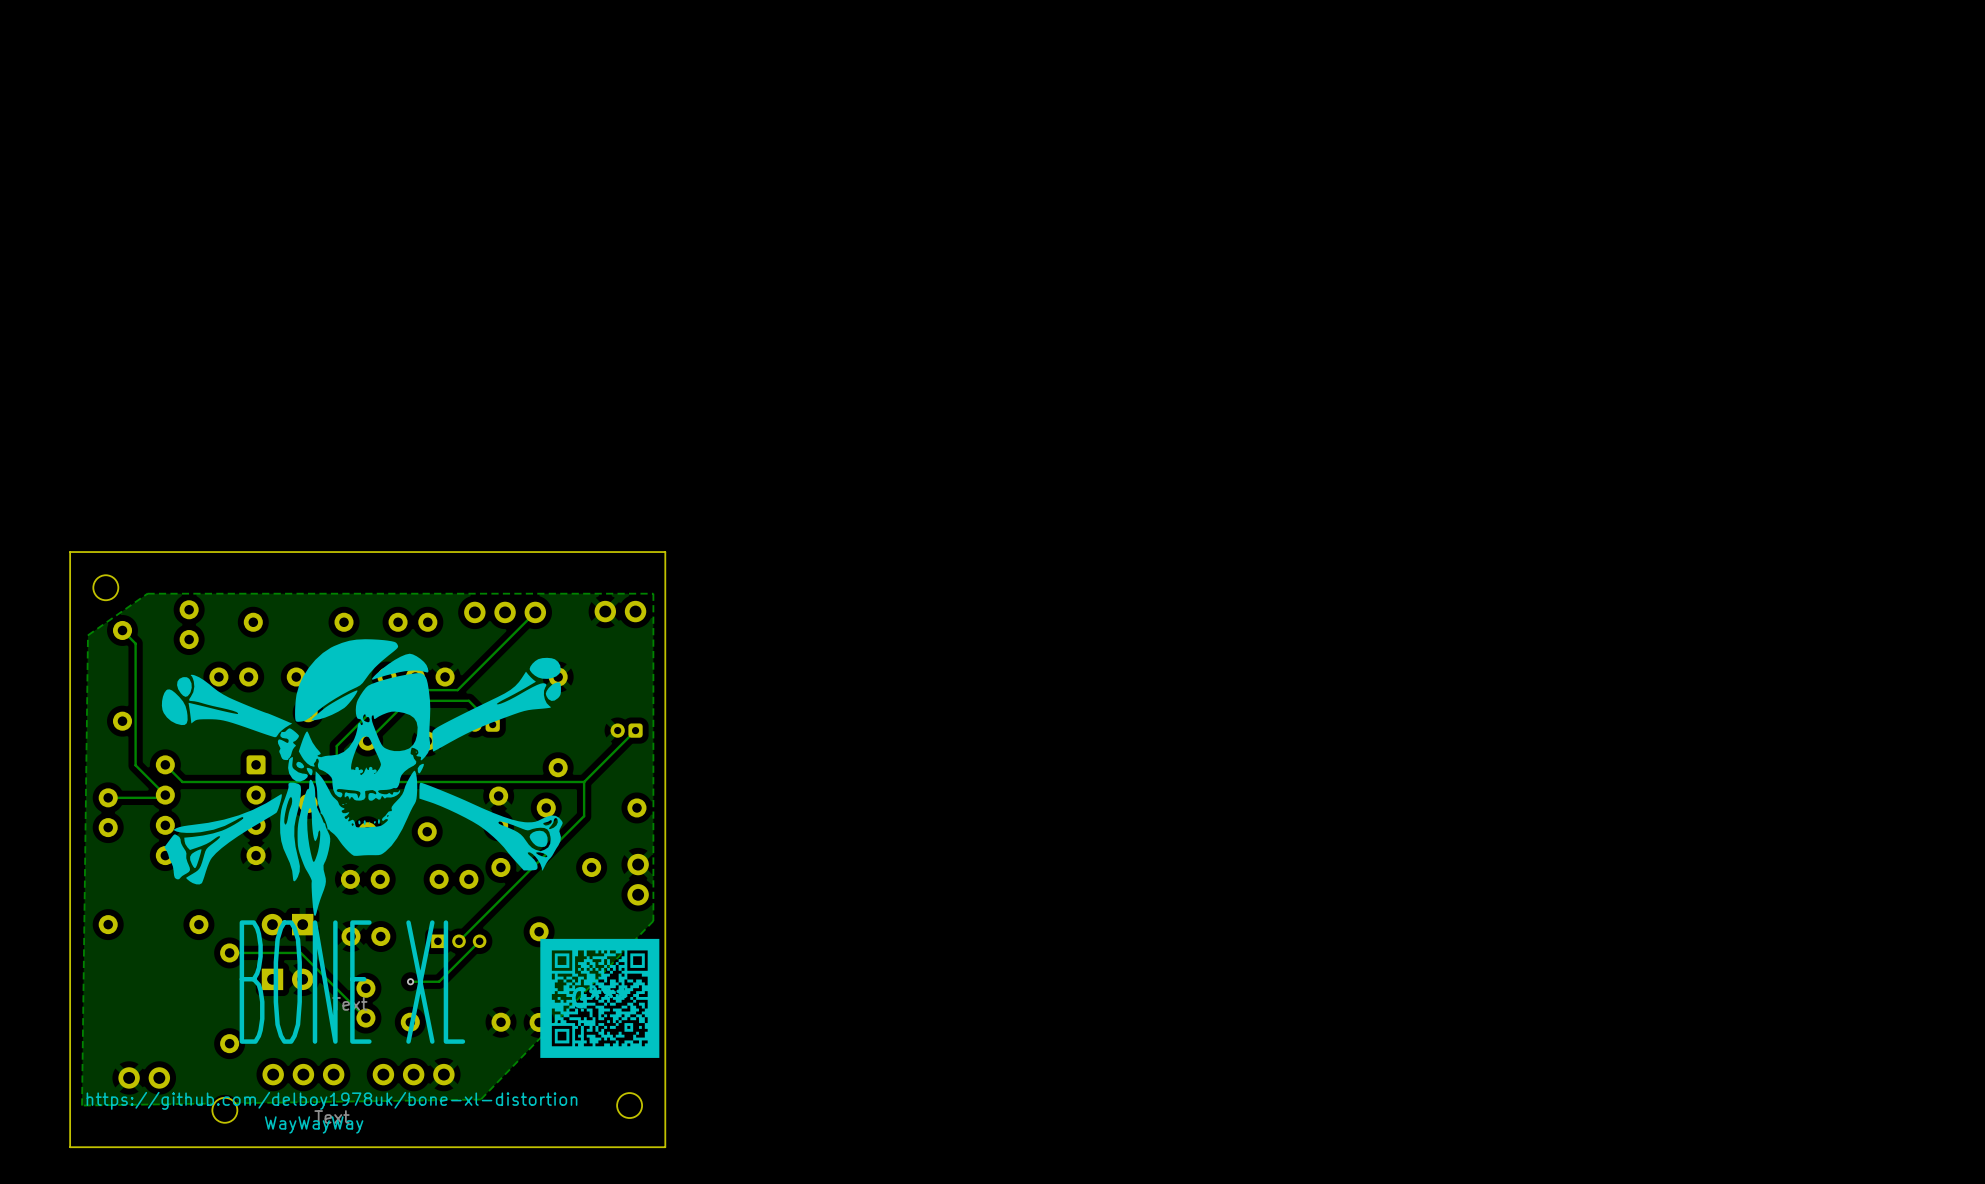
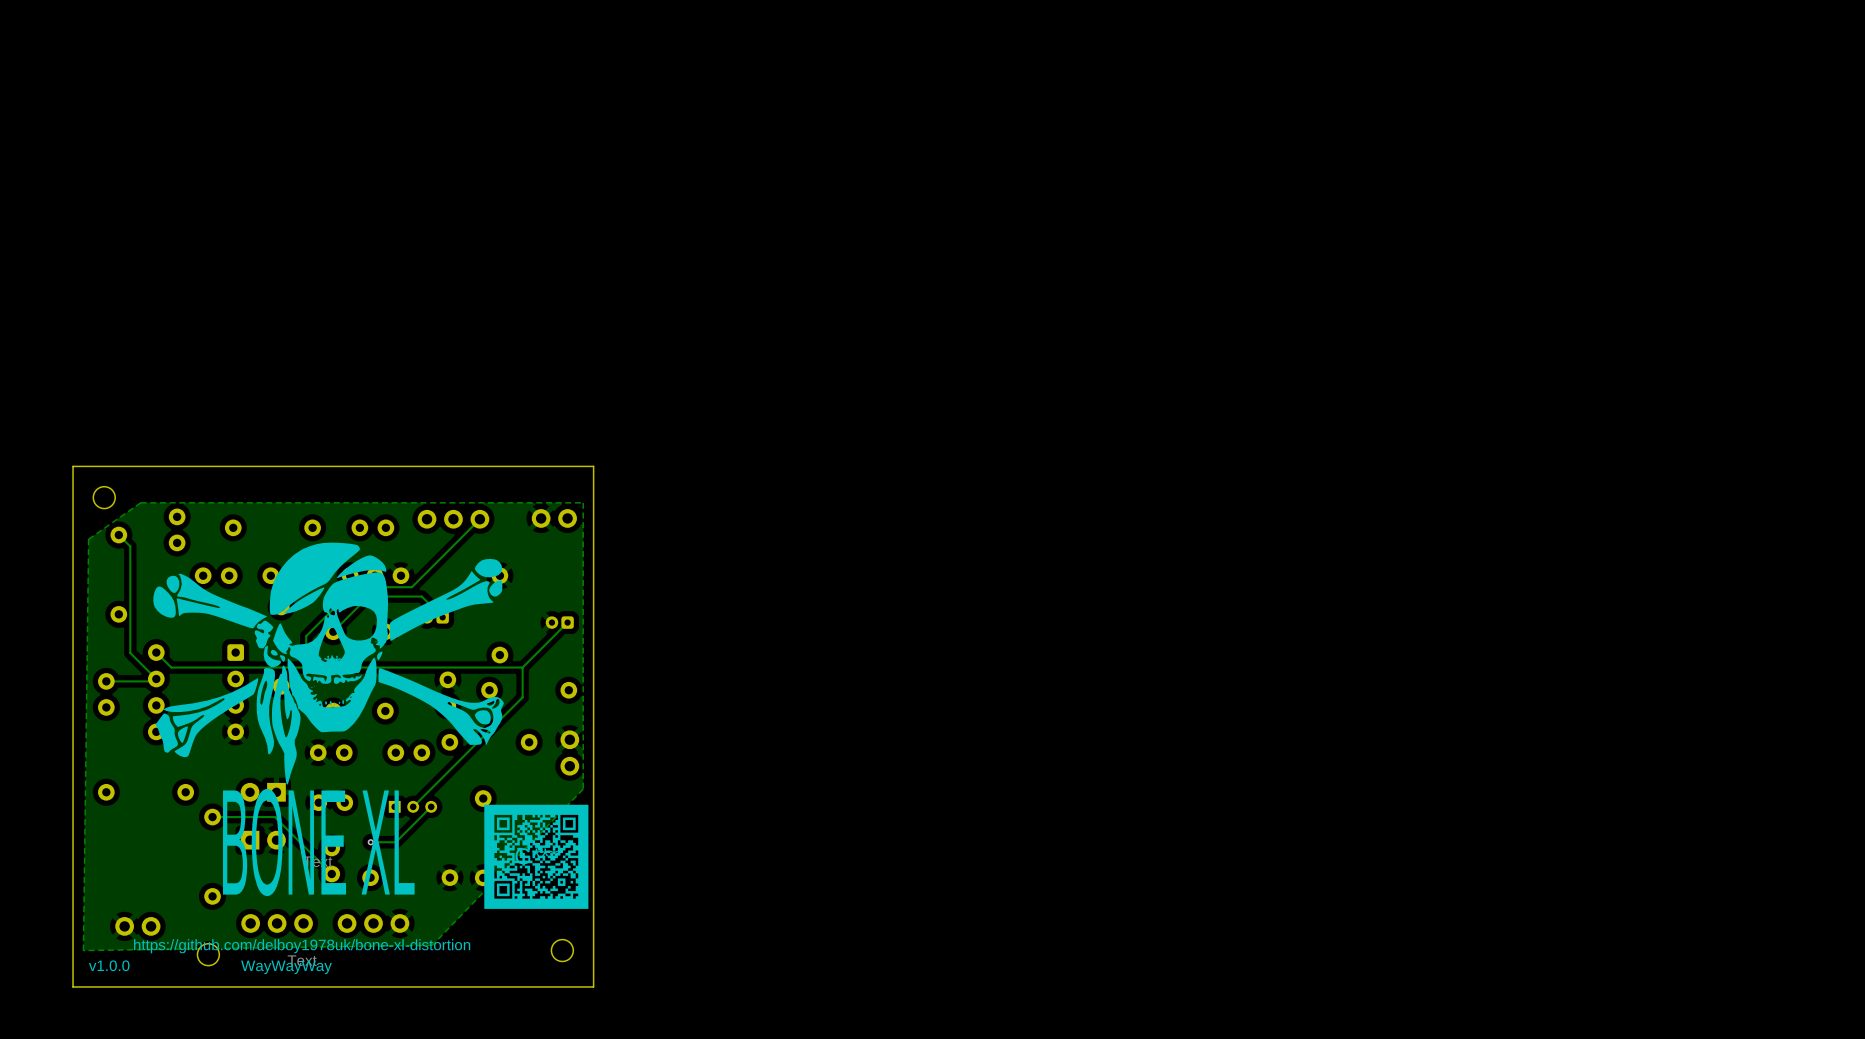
v1.0.0: none -> (109, 965)

